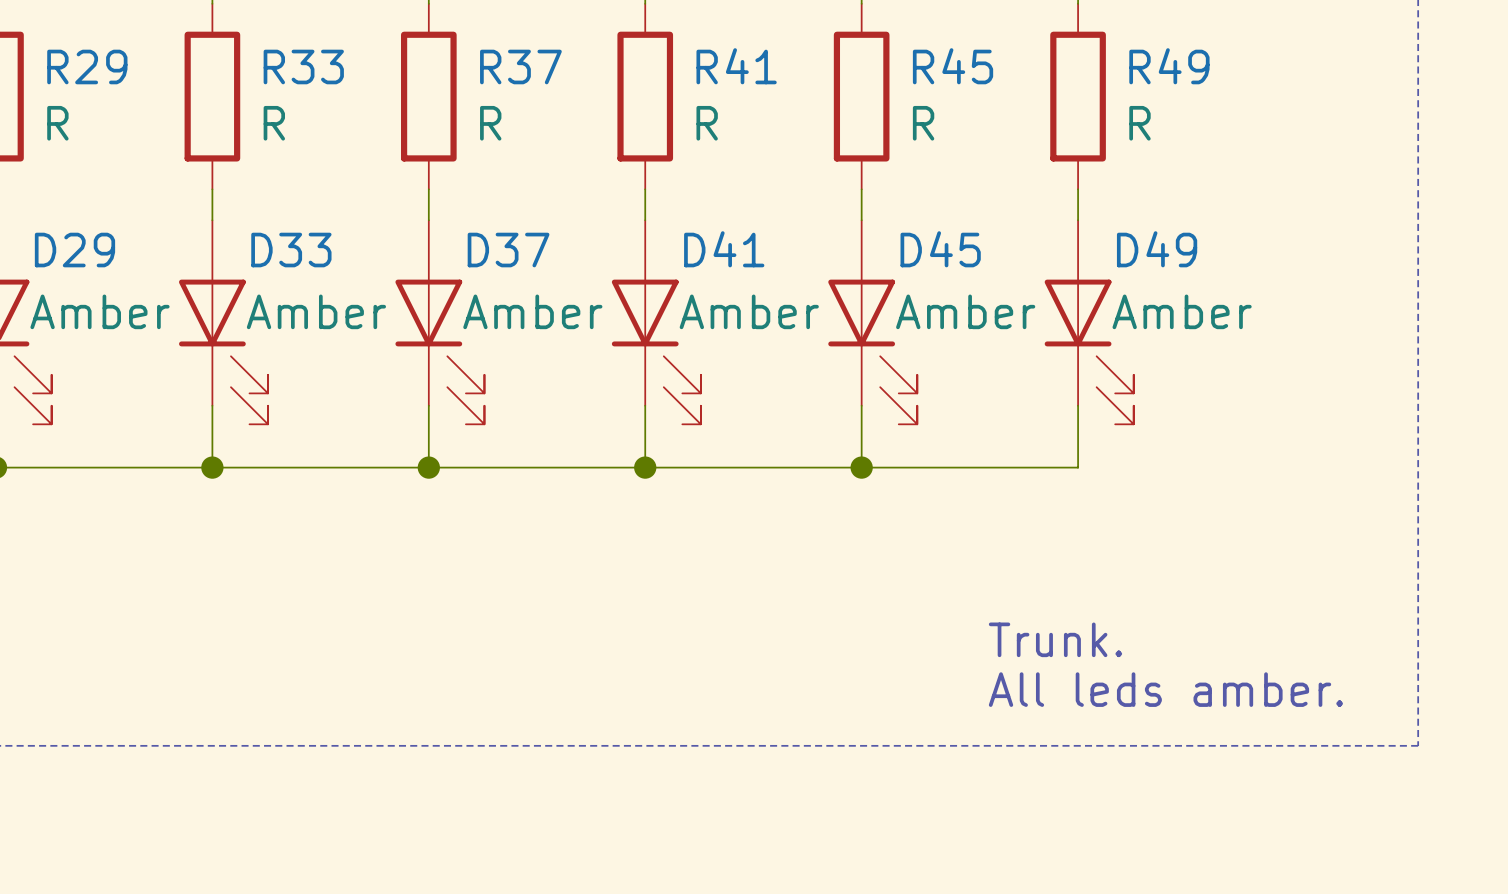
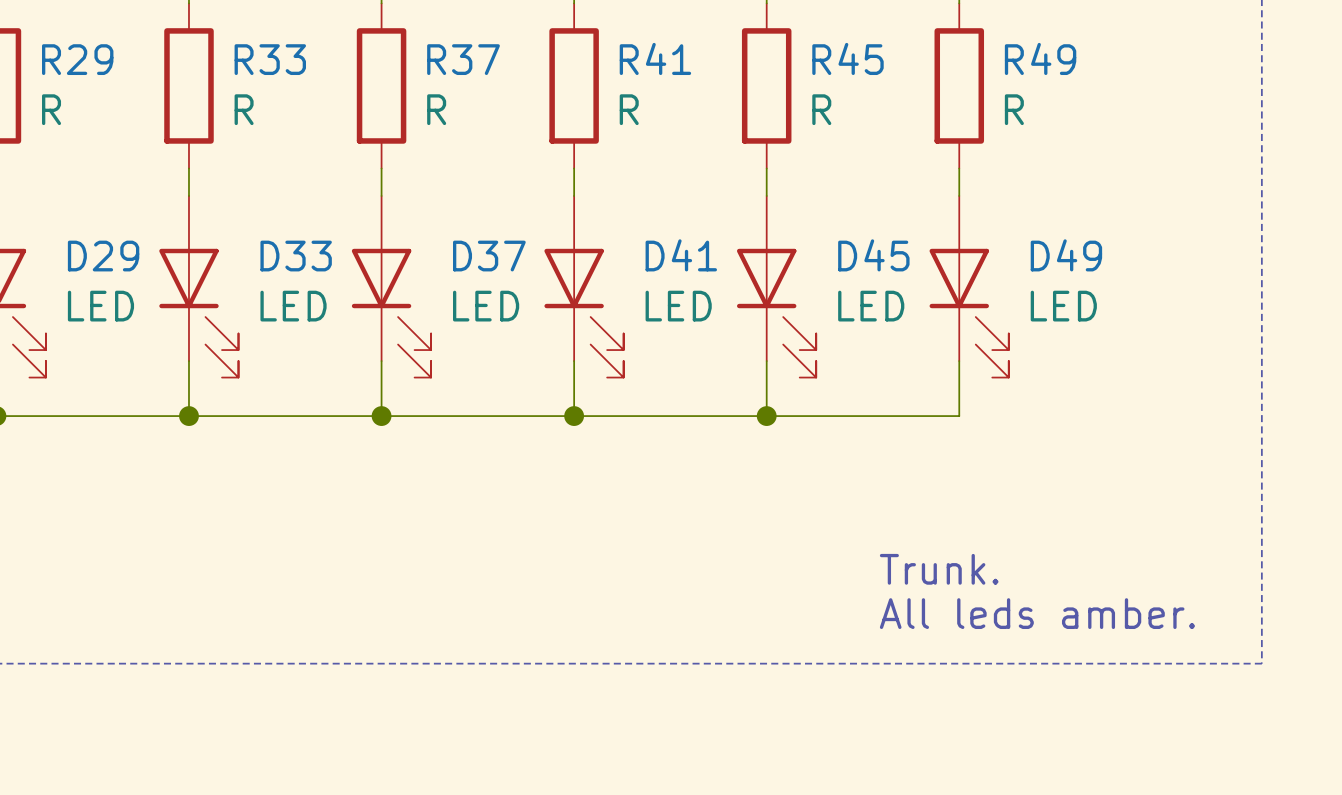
D41 name position: D41 (724, 249) -> D41 (681, 255)
D45 name position: D45 (940, 249) -> D45 (873, 255)
D49 name position: D49 (1157, 249) -> D49 (1066, 255)
D29 name position: D29 (74, 250) -> D29 (103, 256)
D33 name position: D33 (291, 250) -> D33 (296, 256)
D37 name position: D37 (508, 250) -> D37 (489, 256)
D29 value: Amber (100, 311) -> LED (100, 306)
D33 value: Amber (316, 311) -> LED (293, 306)
D37 value: Amber (532, 311) -> LED (486, 306)
D41 value: Amber (749, 311) -> LED (678, 306)
D45 value: Amber (965, 311) -> LED (871, 306)
D49 value: Amber (1182, 311) -> LED (1063, 306)

